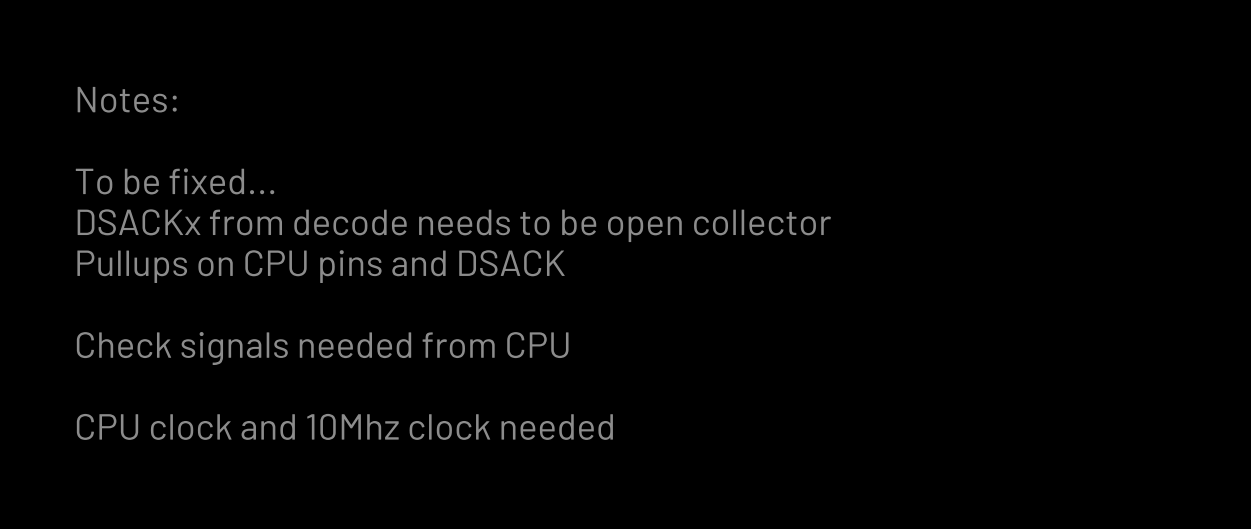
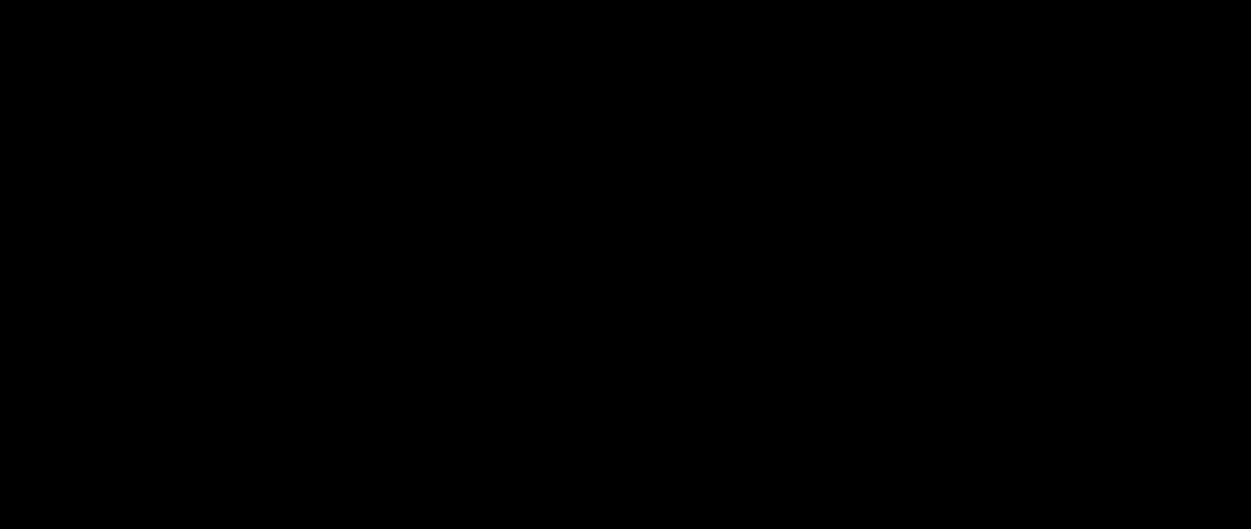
text: Notes: (127, 99) -> none
text: To be fixed... (175, 181) -> none
text: DSACKx from decode needs to be open collector (454, 225) -> none
text: Pullups on CPU pins and DSACK (321, 266) -> none
text: Check signals needed from CPU (322, 348) -> none
text: CPU clock and 10Mhz clock needed (344, 426) -> none

